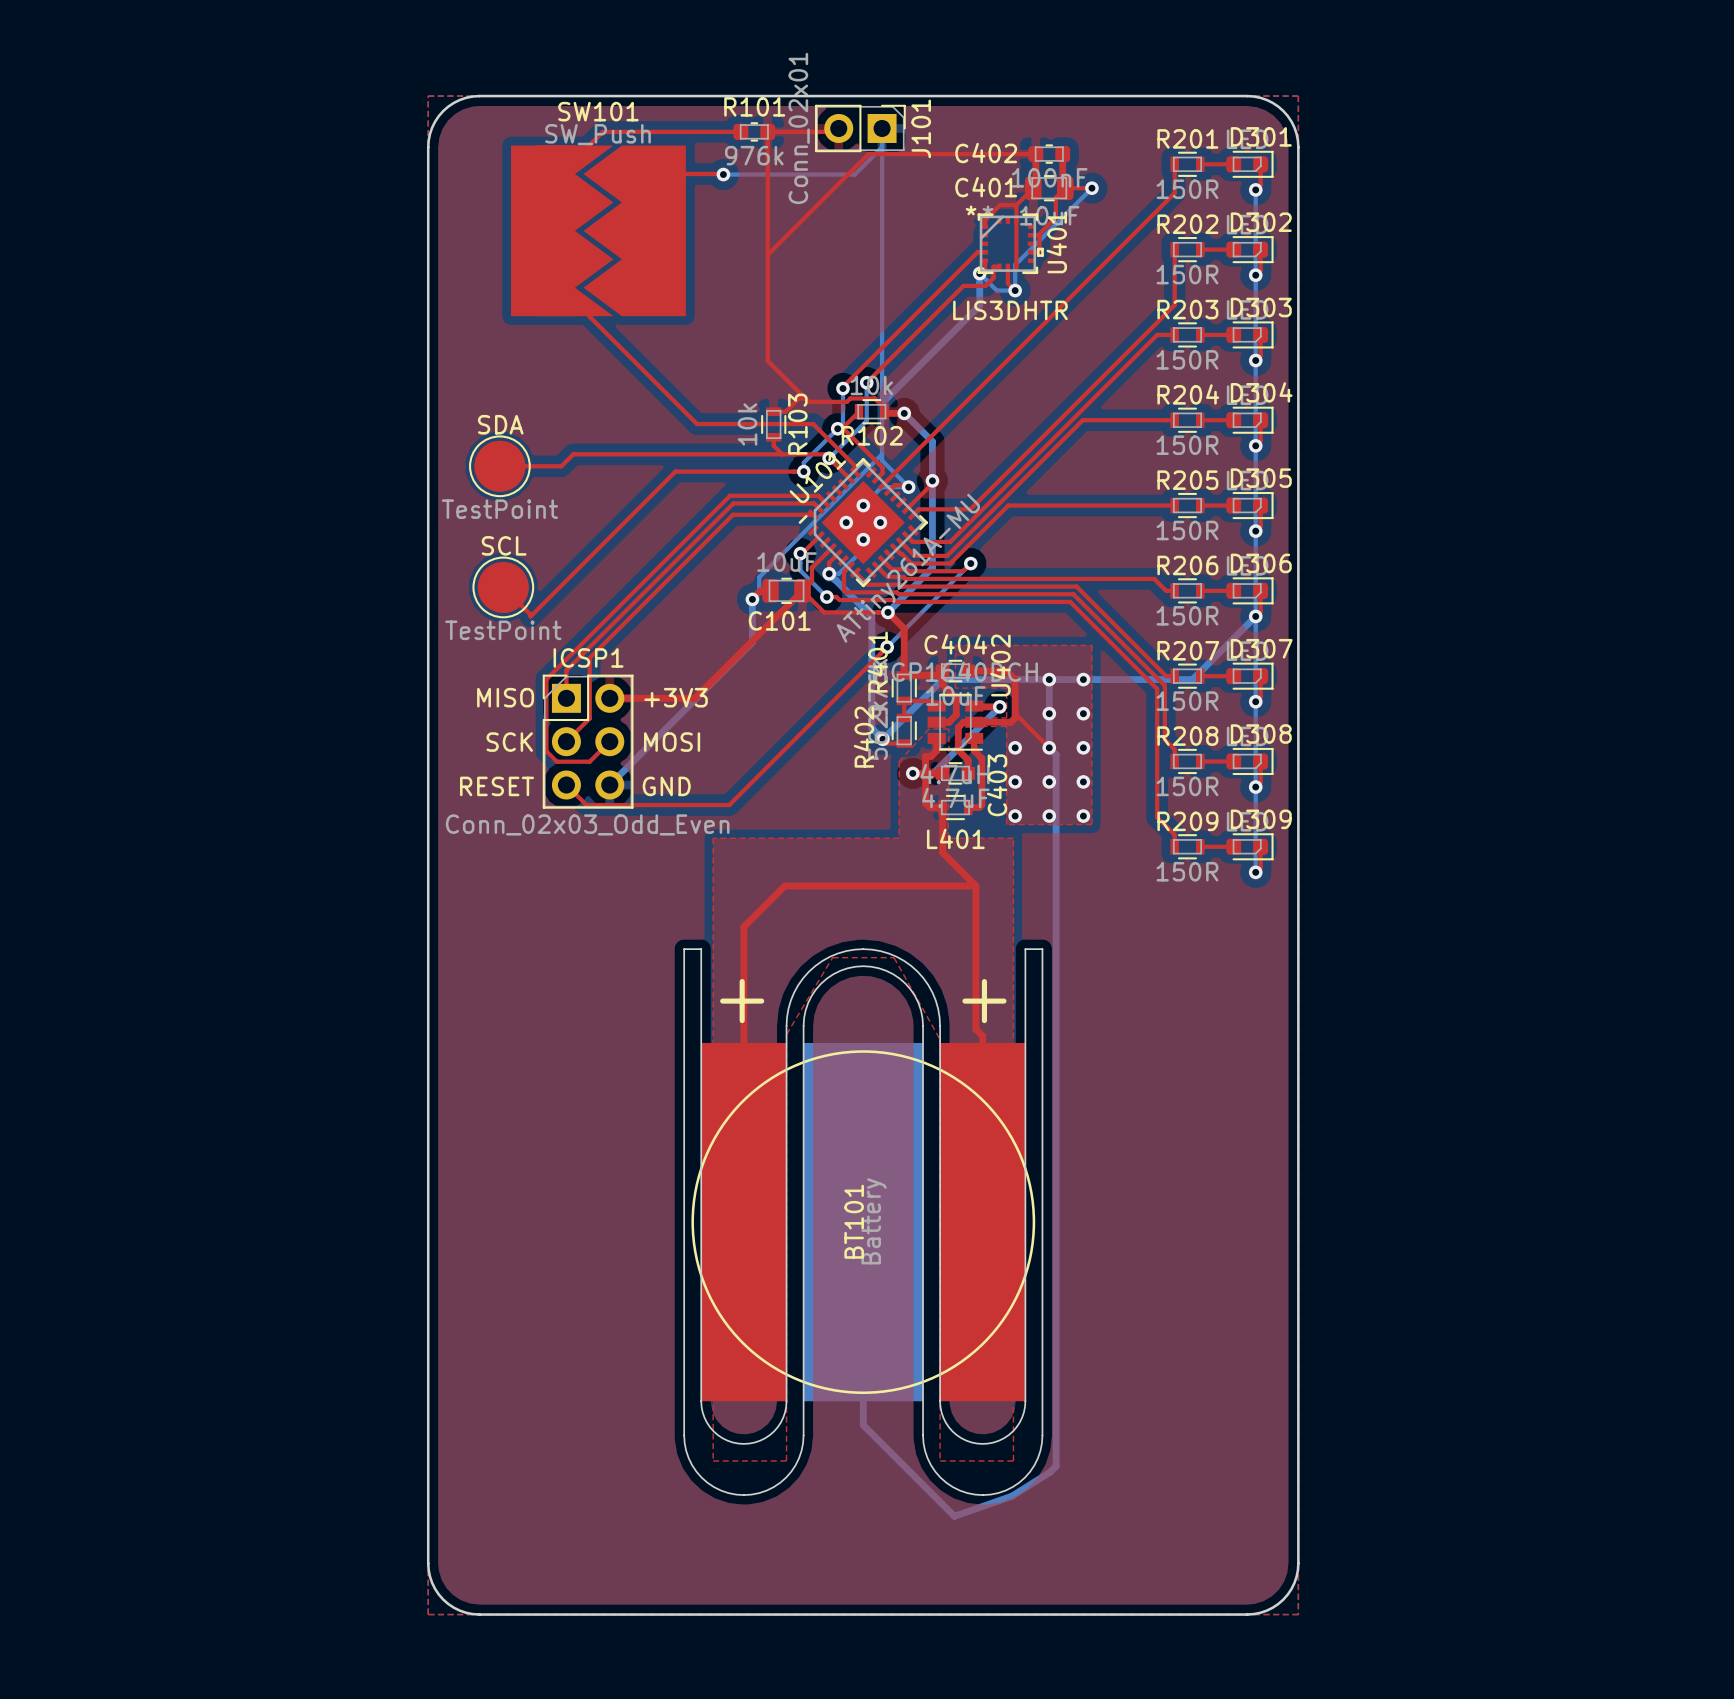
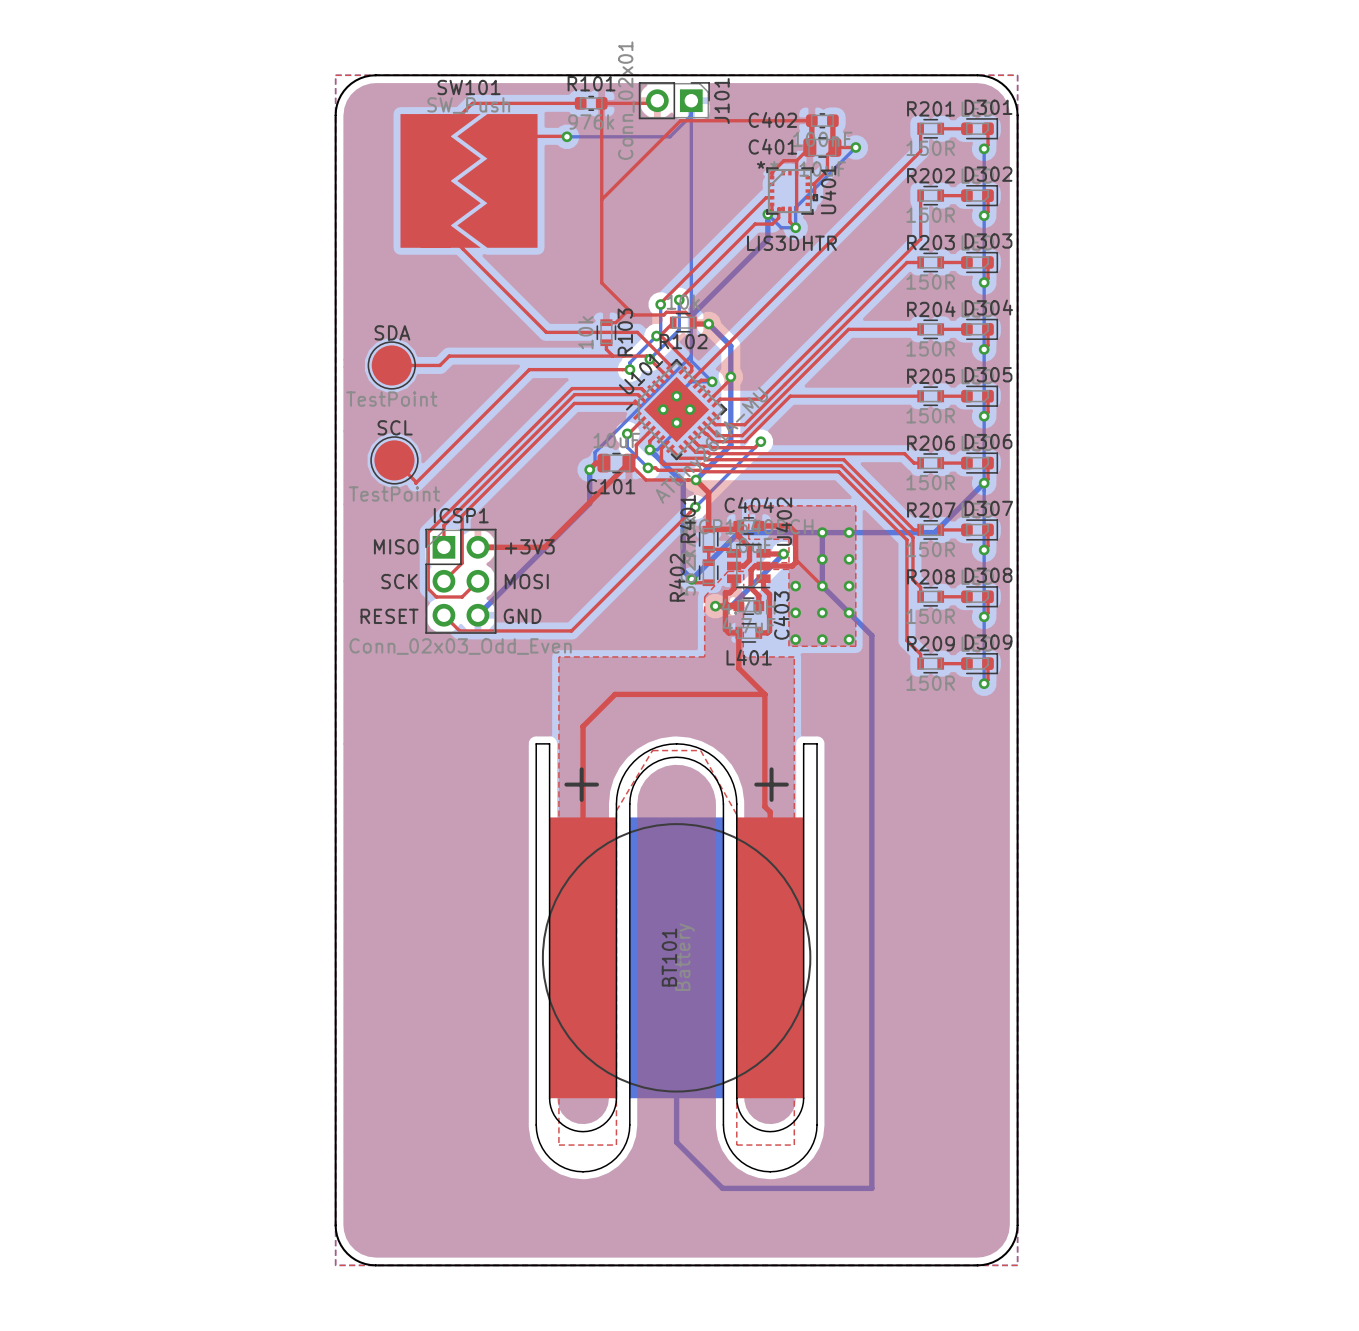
bottom track: (1056, 754) (1056, 1466) (1050, 1472) (1012, 1496) (954, 1516) (863, 1425) -> (827, 591) (871, 635) (871, 1188) (722, 1188) (676, 1142) (676, 1116)

